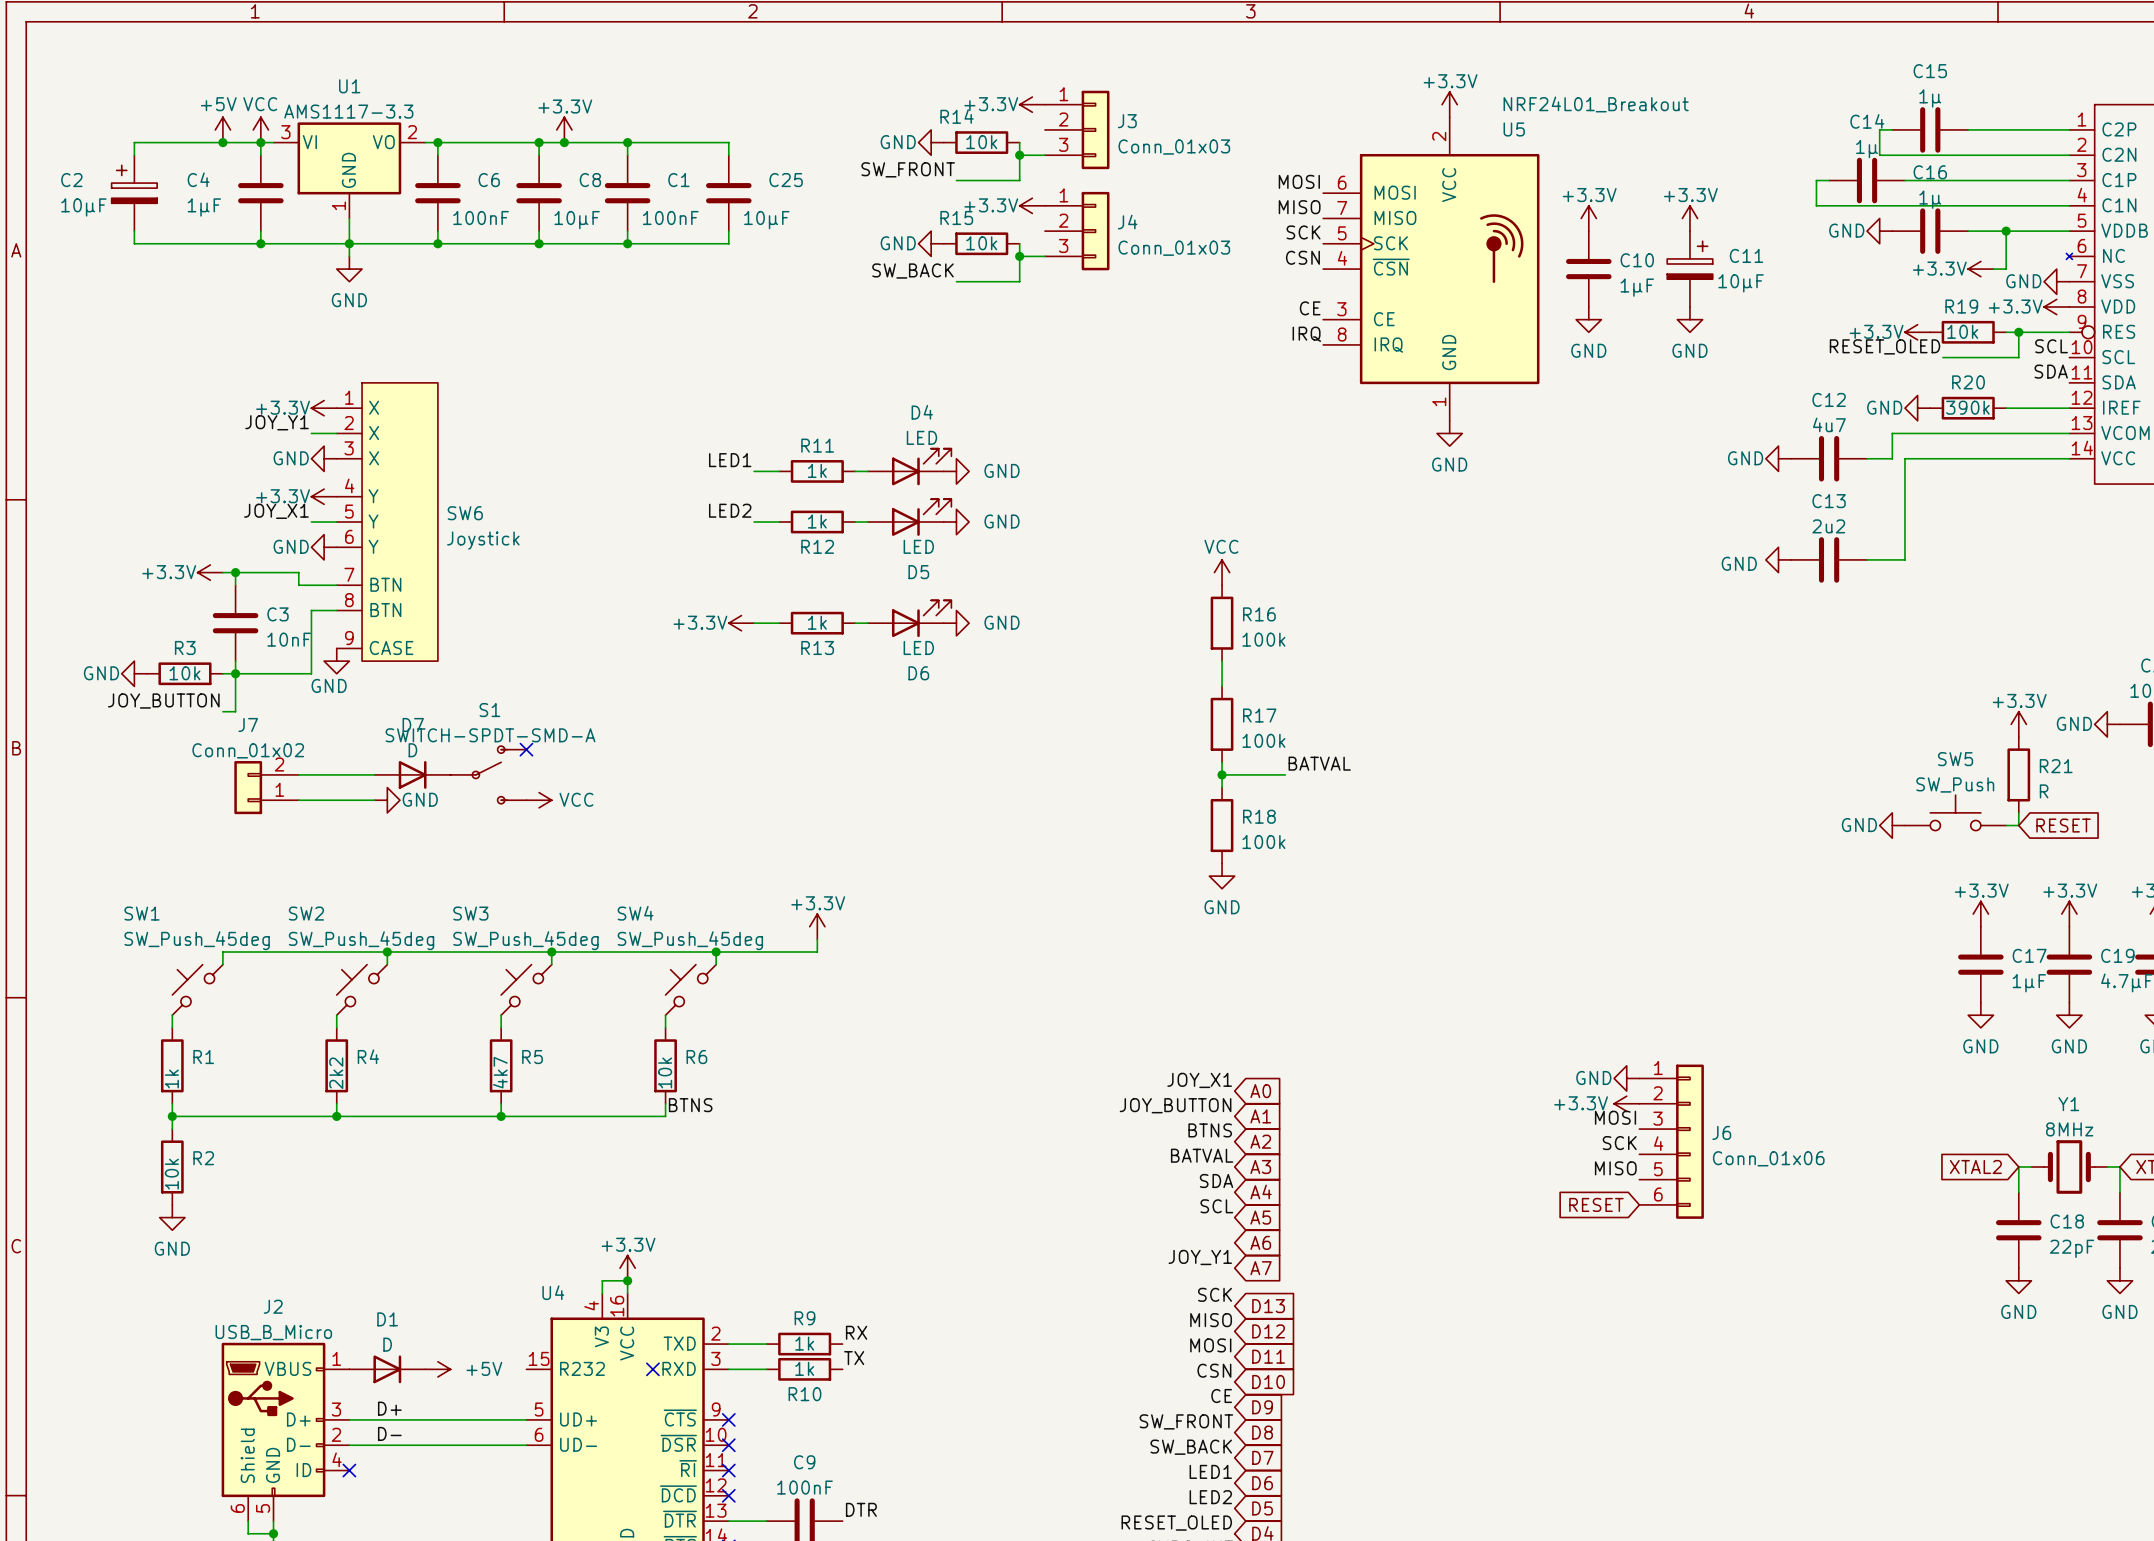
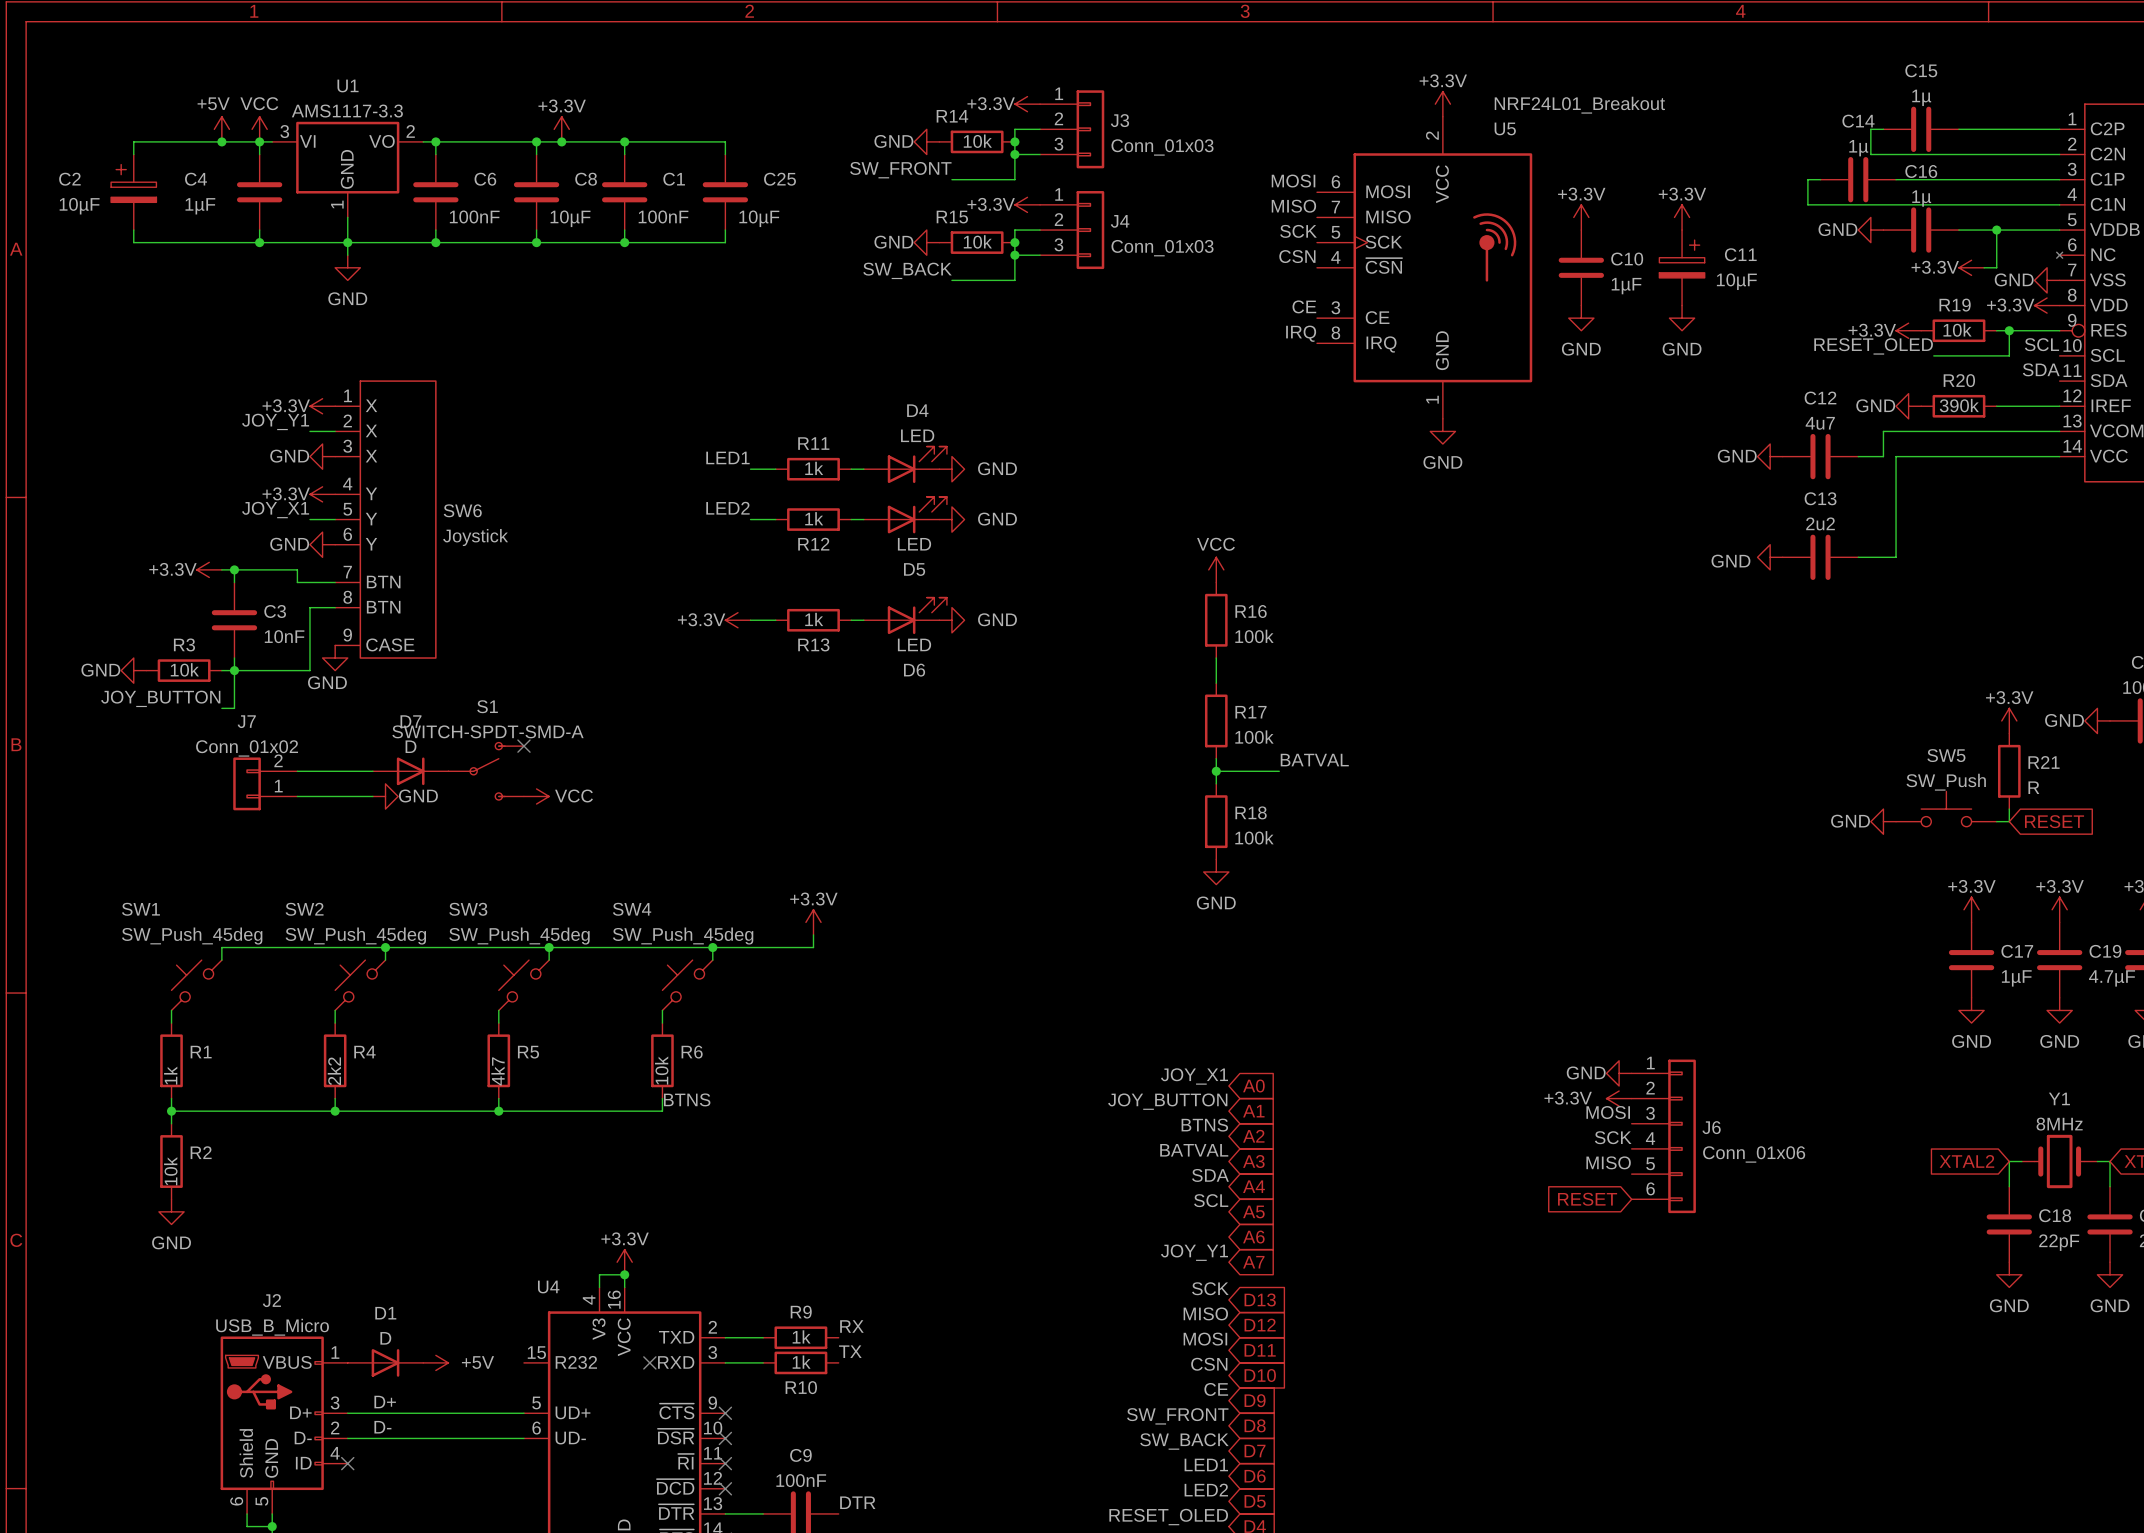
wire: none -> (1040, 129) (1014, 129) (1014, 141)
junction: none -> (1014, 141)
wire: none -> (1040, 230) (1014, 230) (1014, 242)
junction: none -> (1014, 242)

